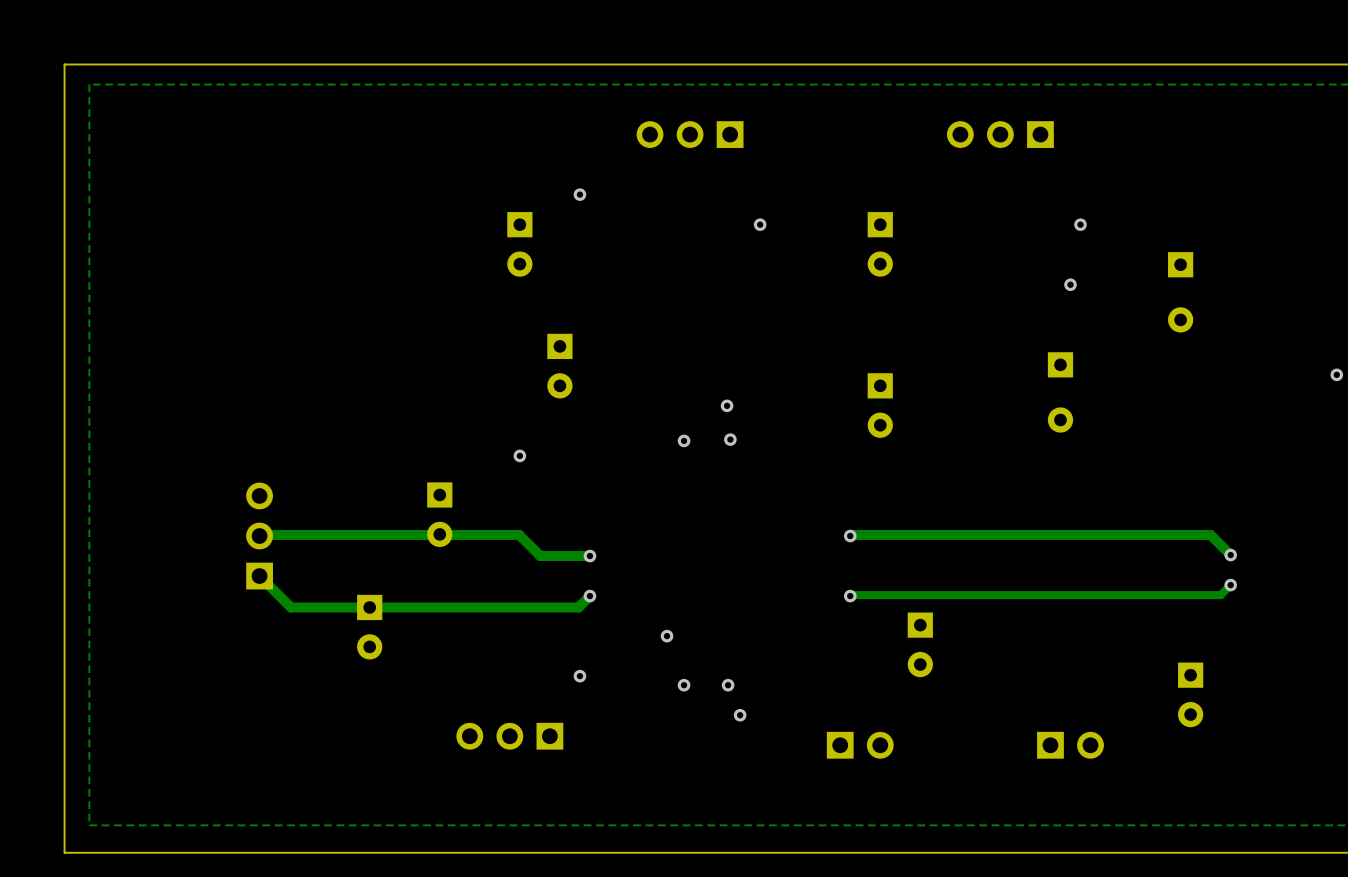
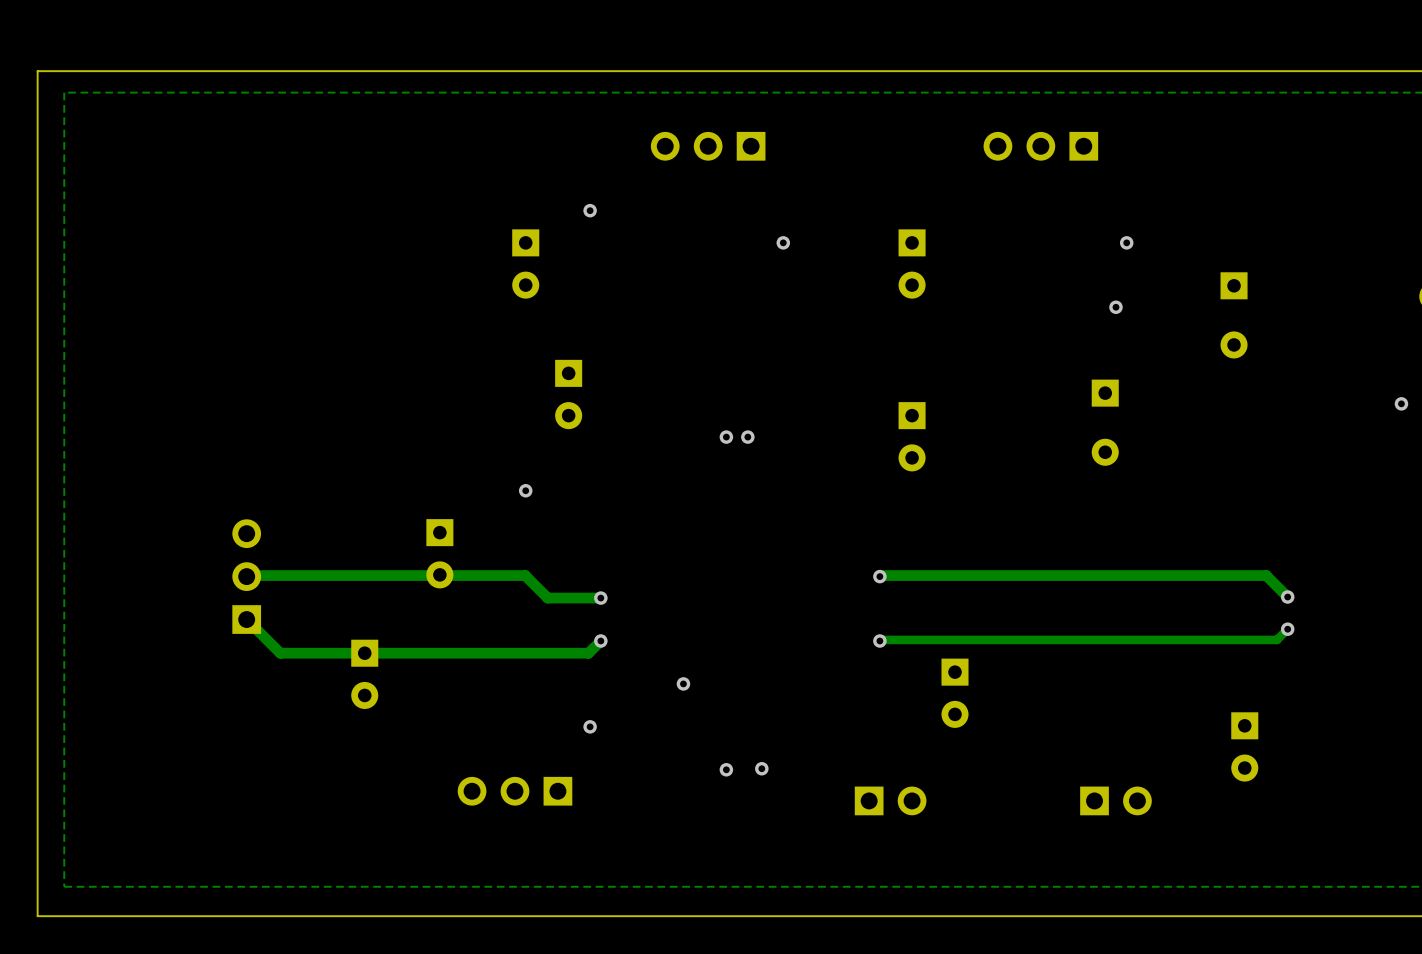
via: none -> (726, 437)
via: (730, 439) -> none
via: (684, 440) -> none
via: (684, 685) -> none
via: (728, 685) -> none
via: none -> (726, 769)

